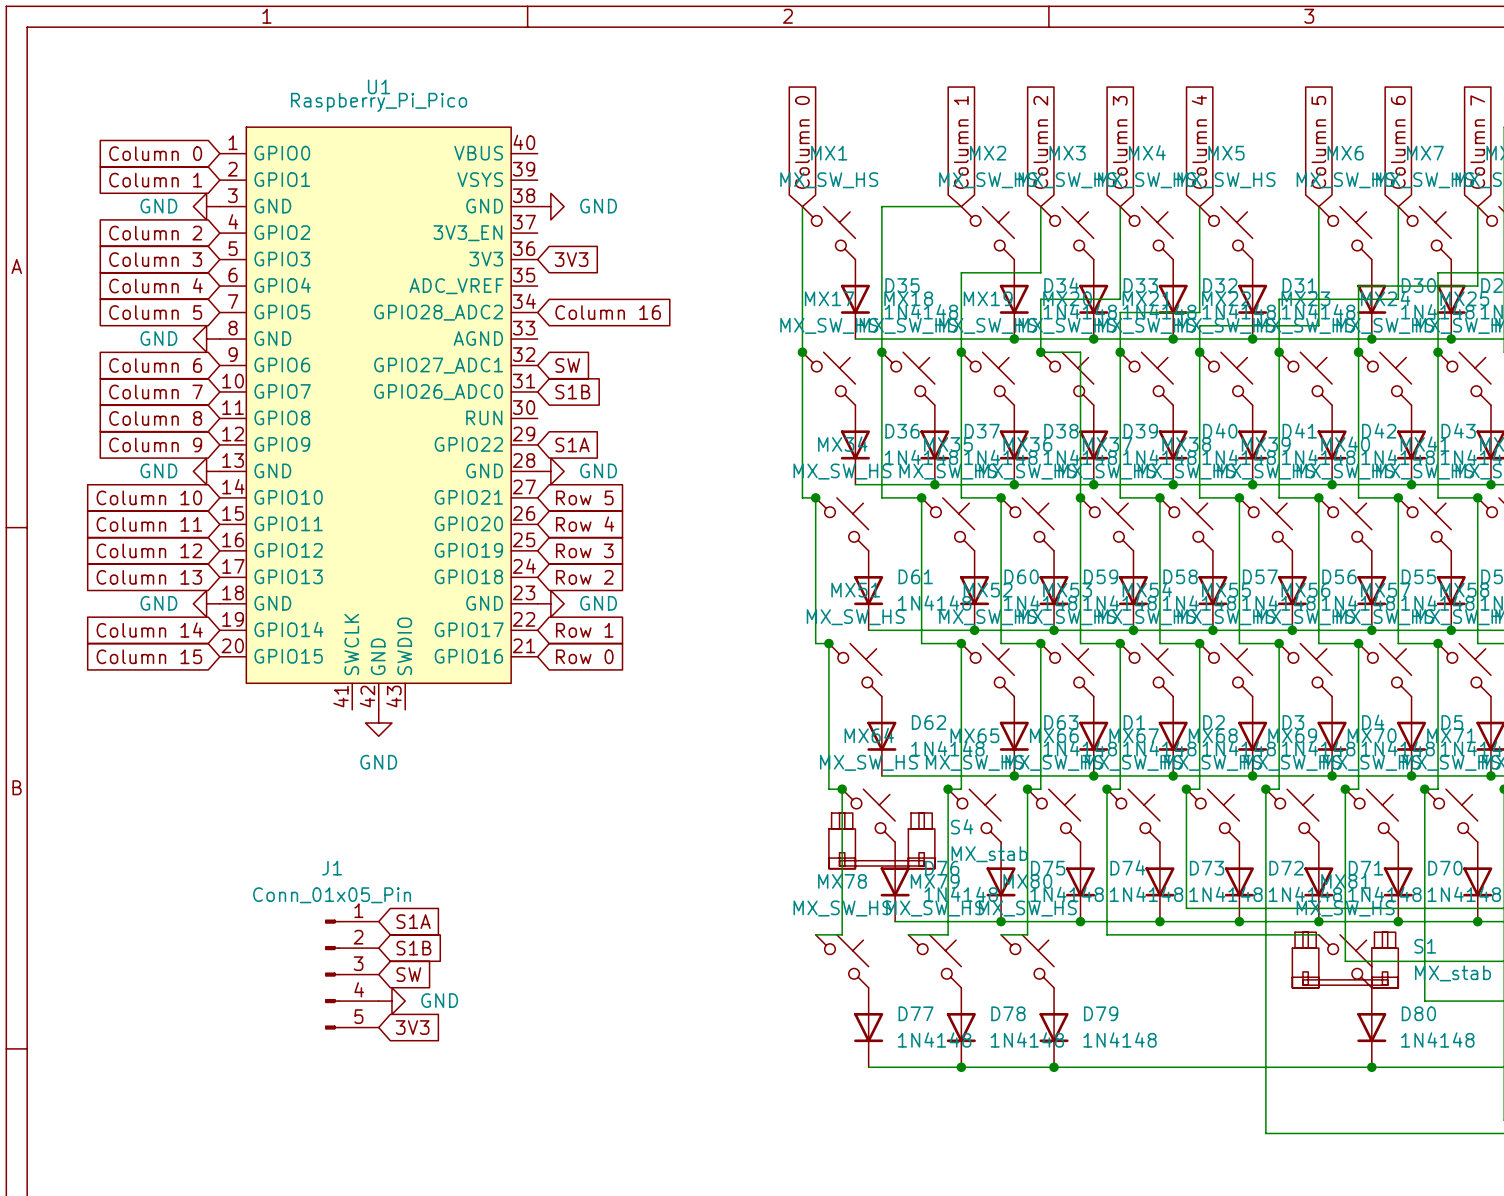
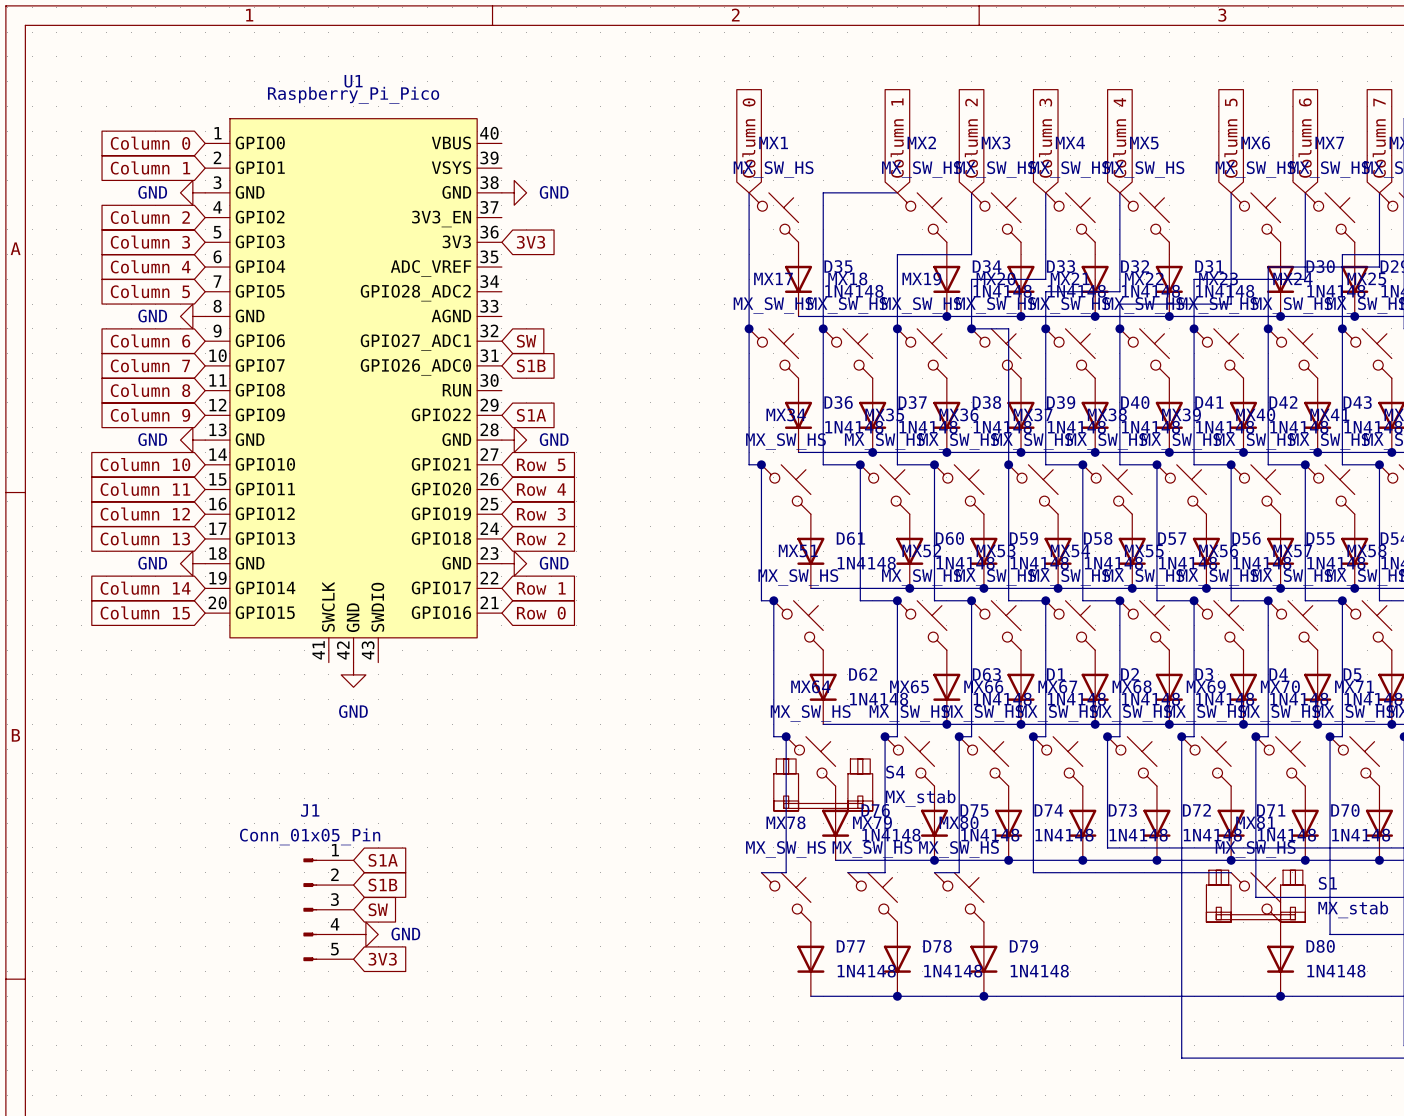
global label: Column 16 (608, 312) -> none

